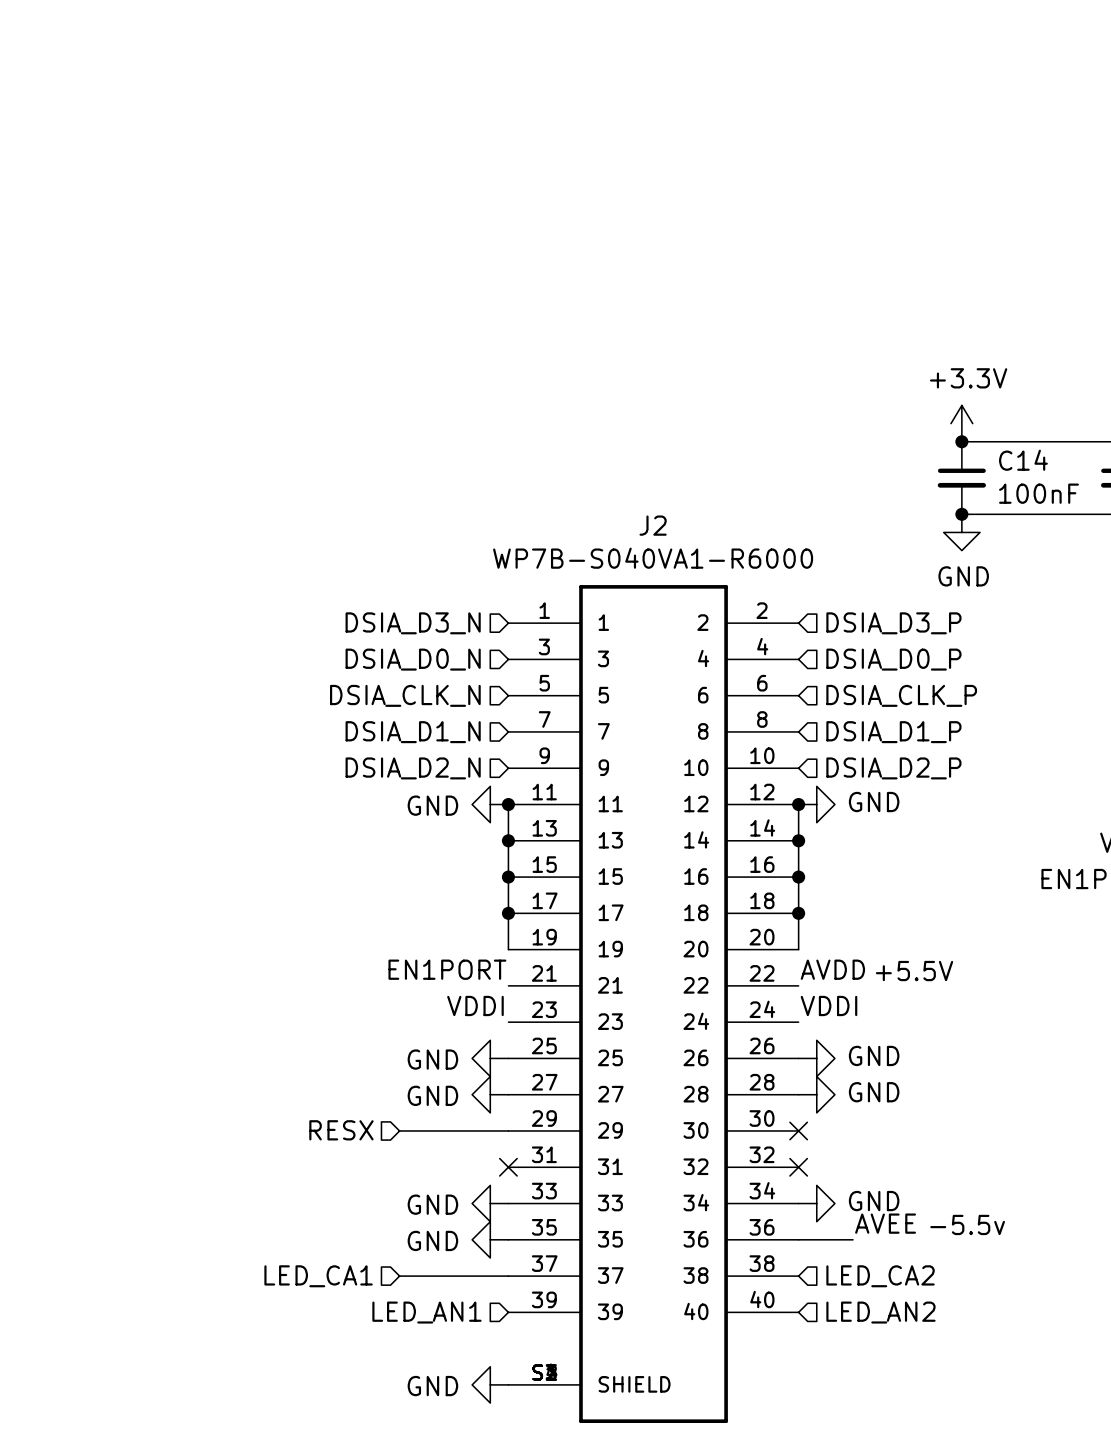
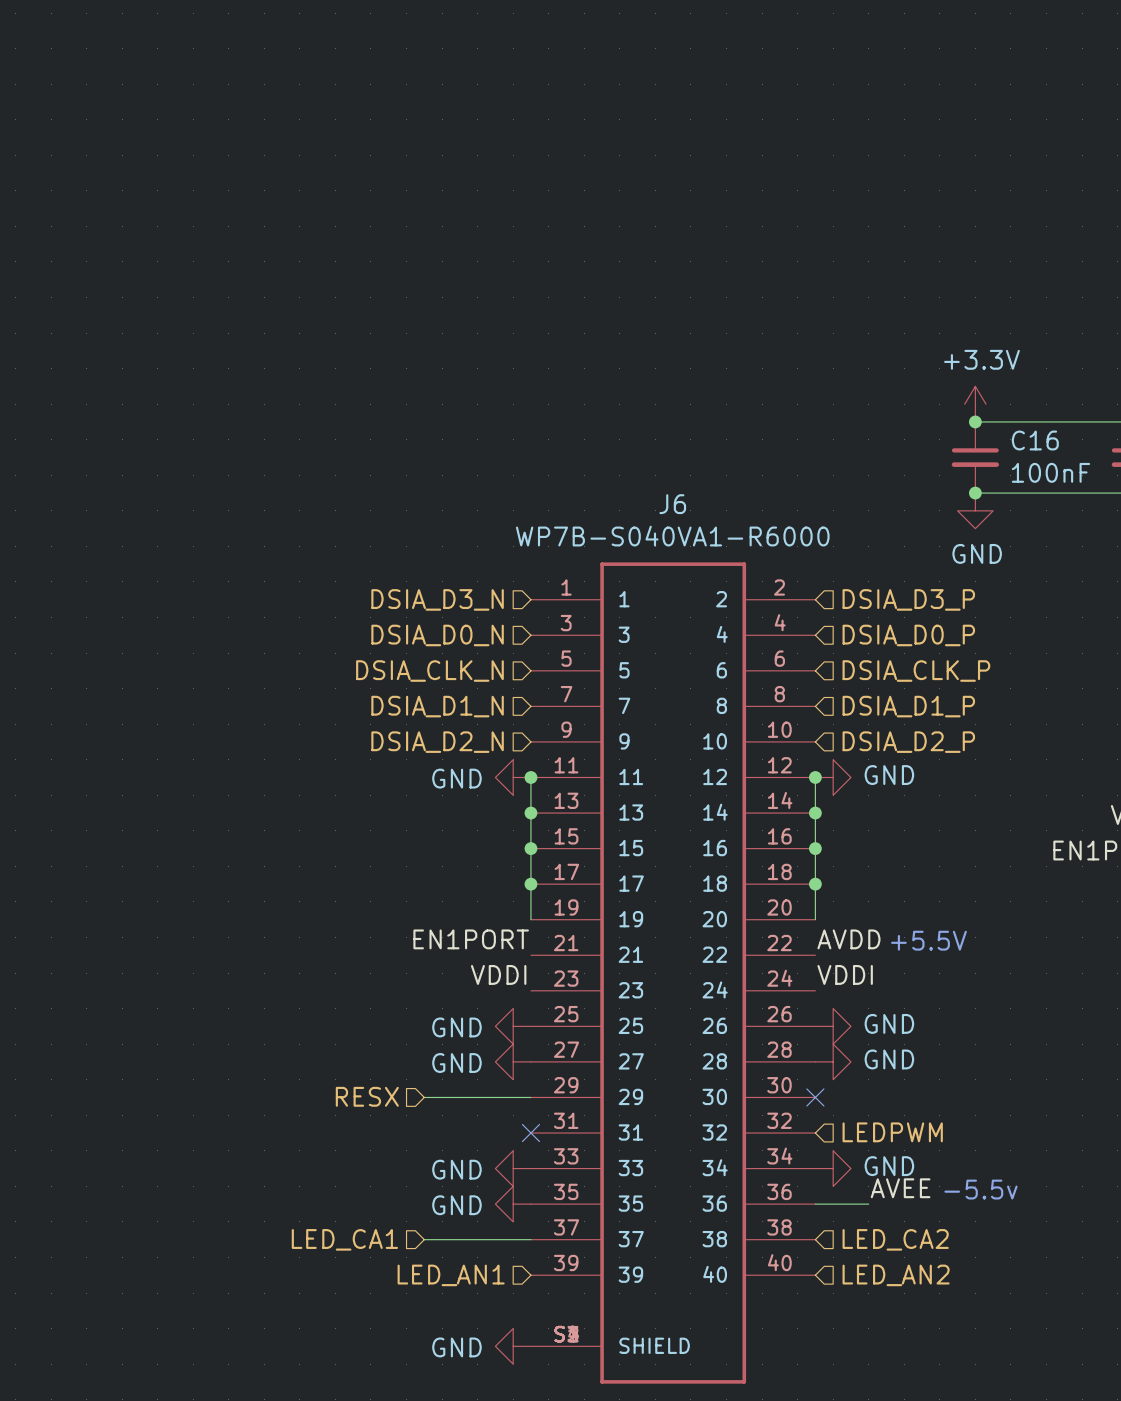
C14 name: C14 (1023, 460) -> C16 (1035, 440)
J2 name: J2 (653, 525) -> J6 (672, 504)
hierarchical label: none -> LEDPWM (892, 1132)
no-connect mark: (798, 1167) -> none

